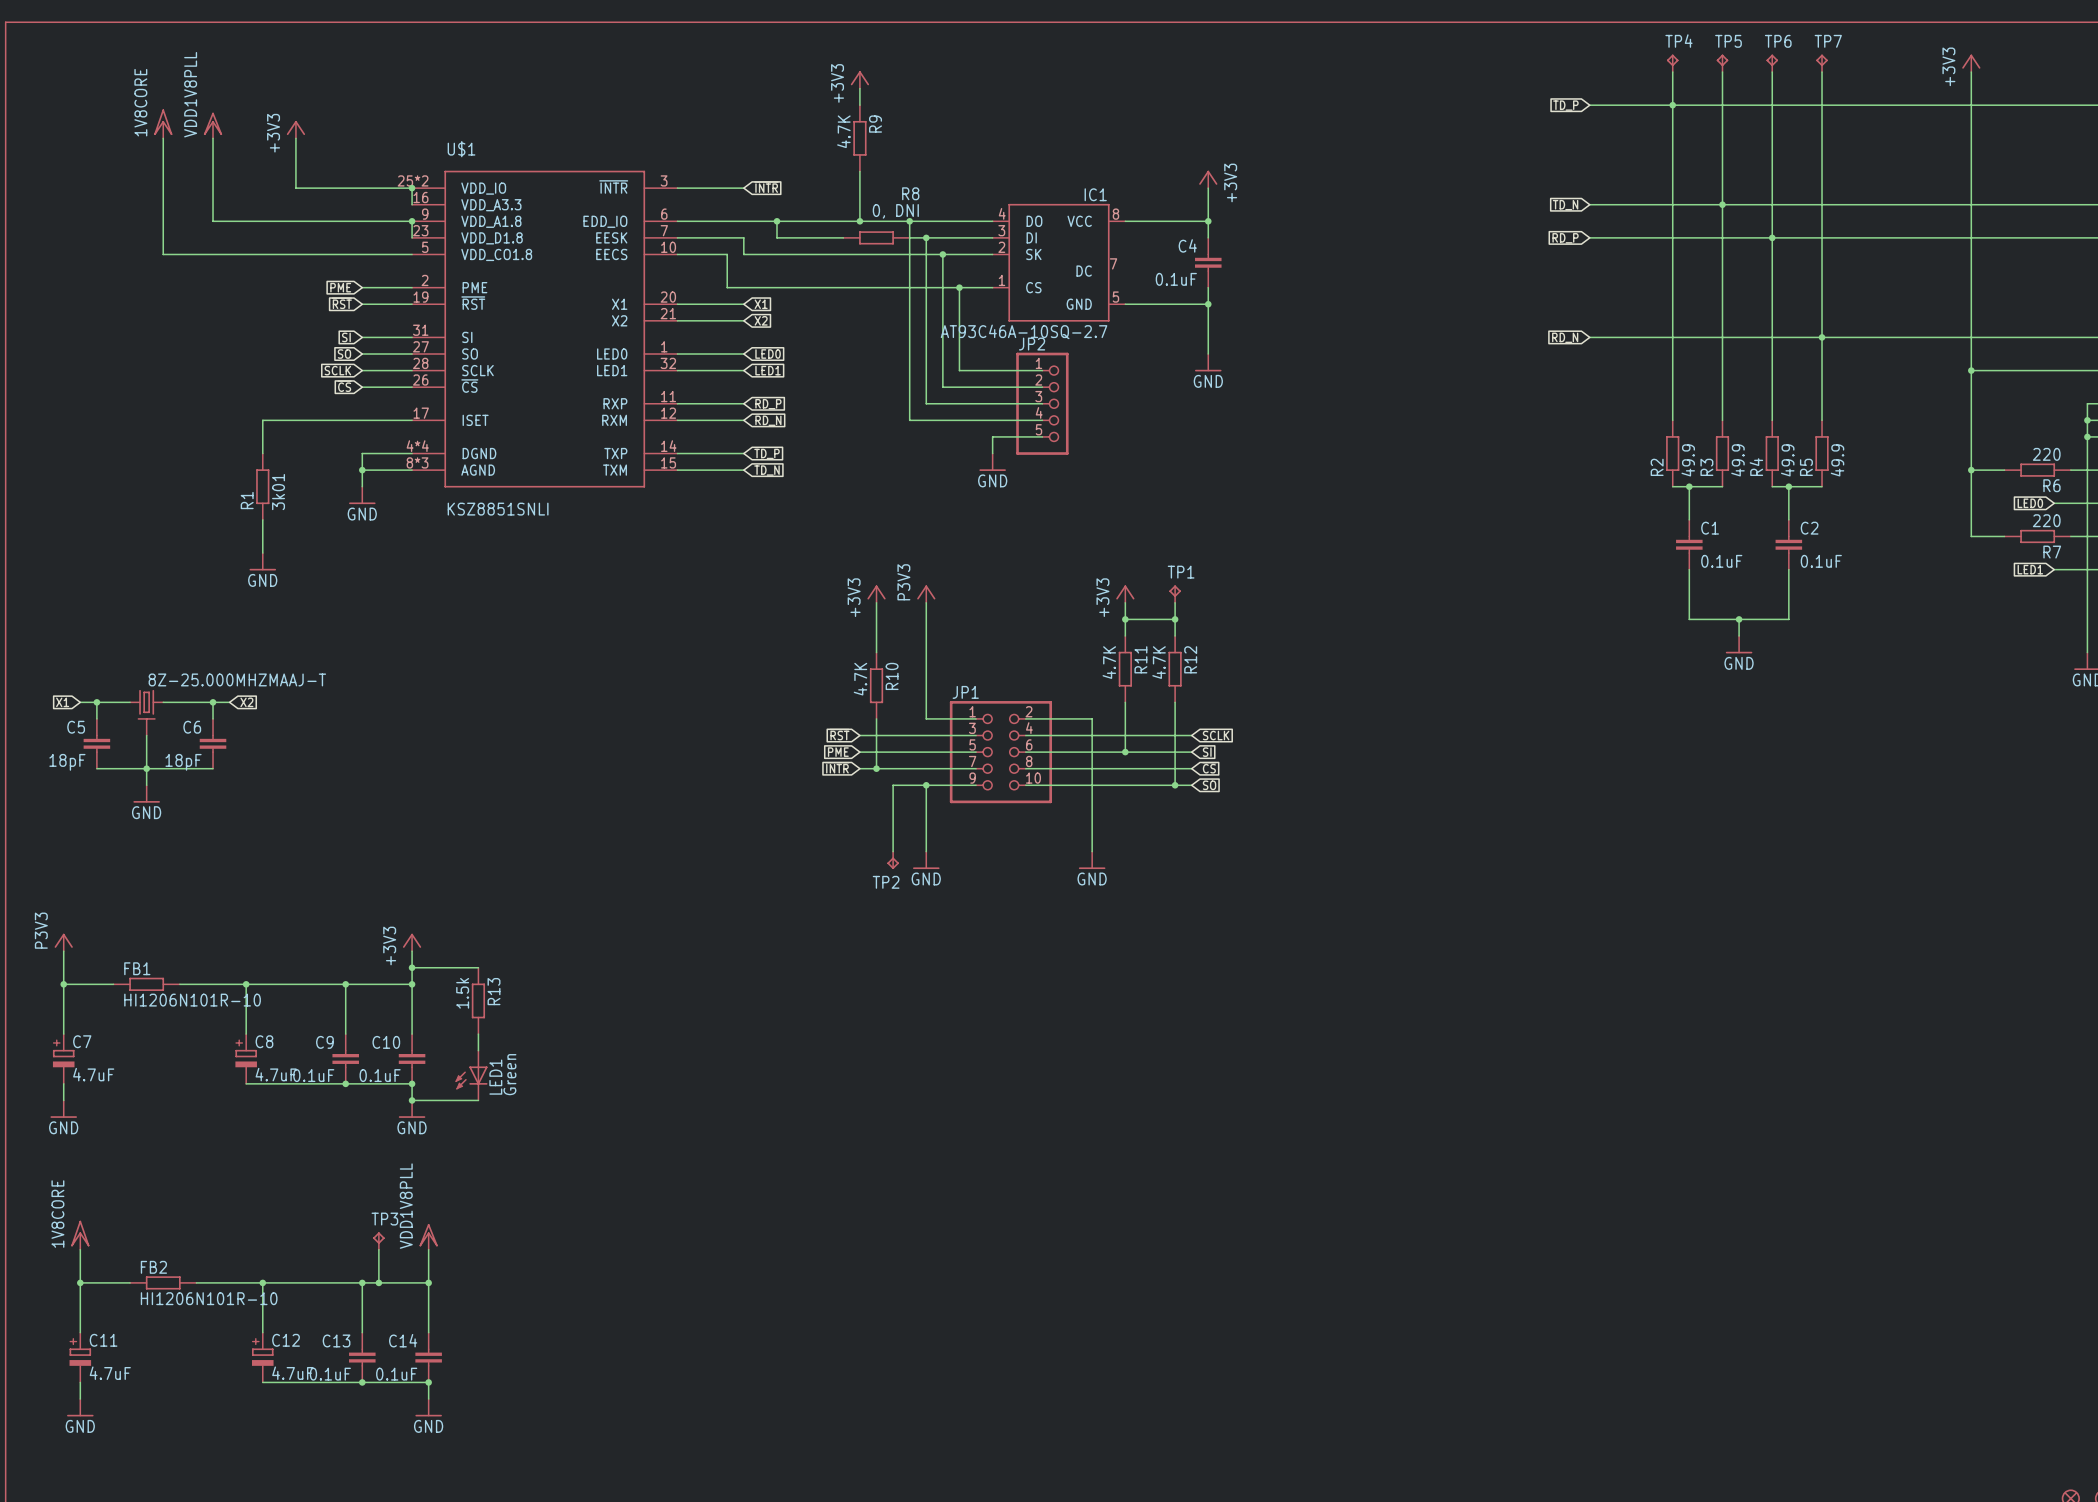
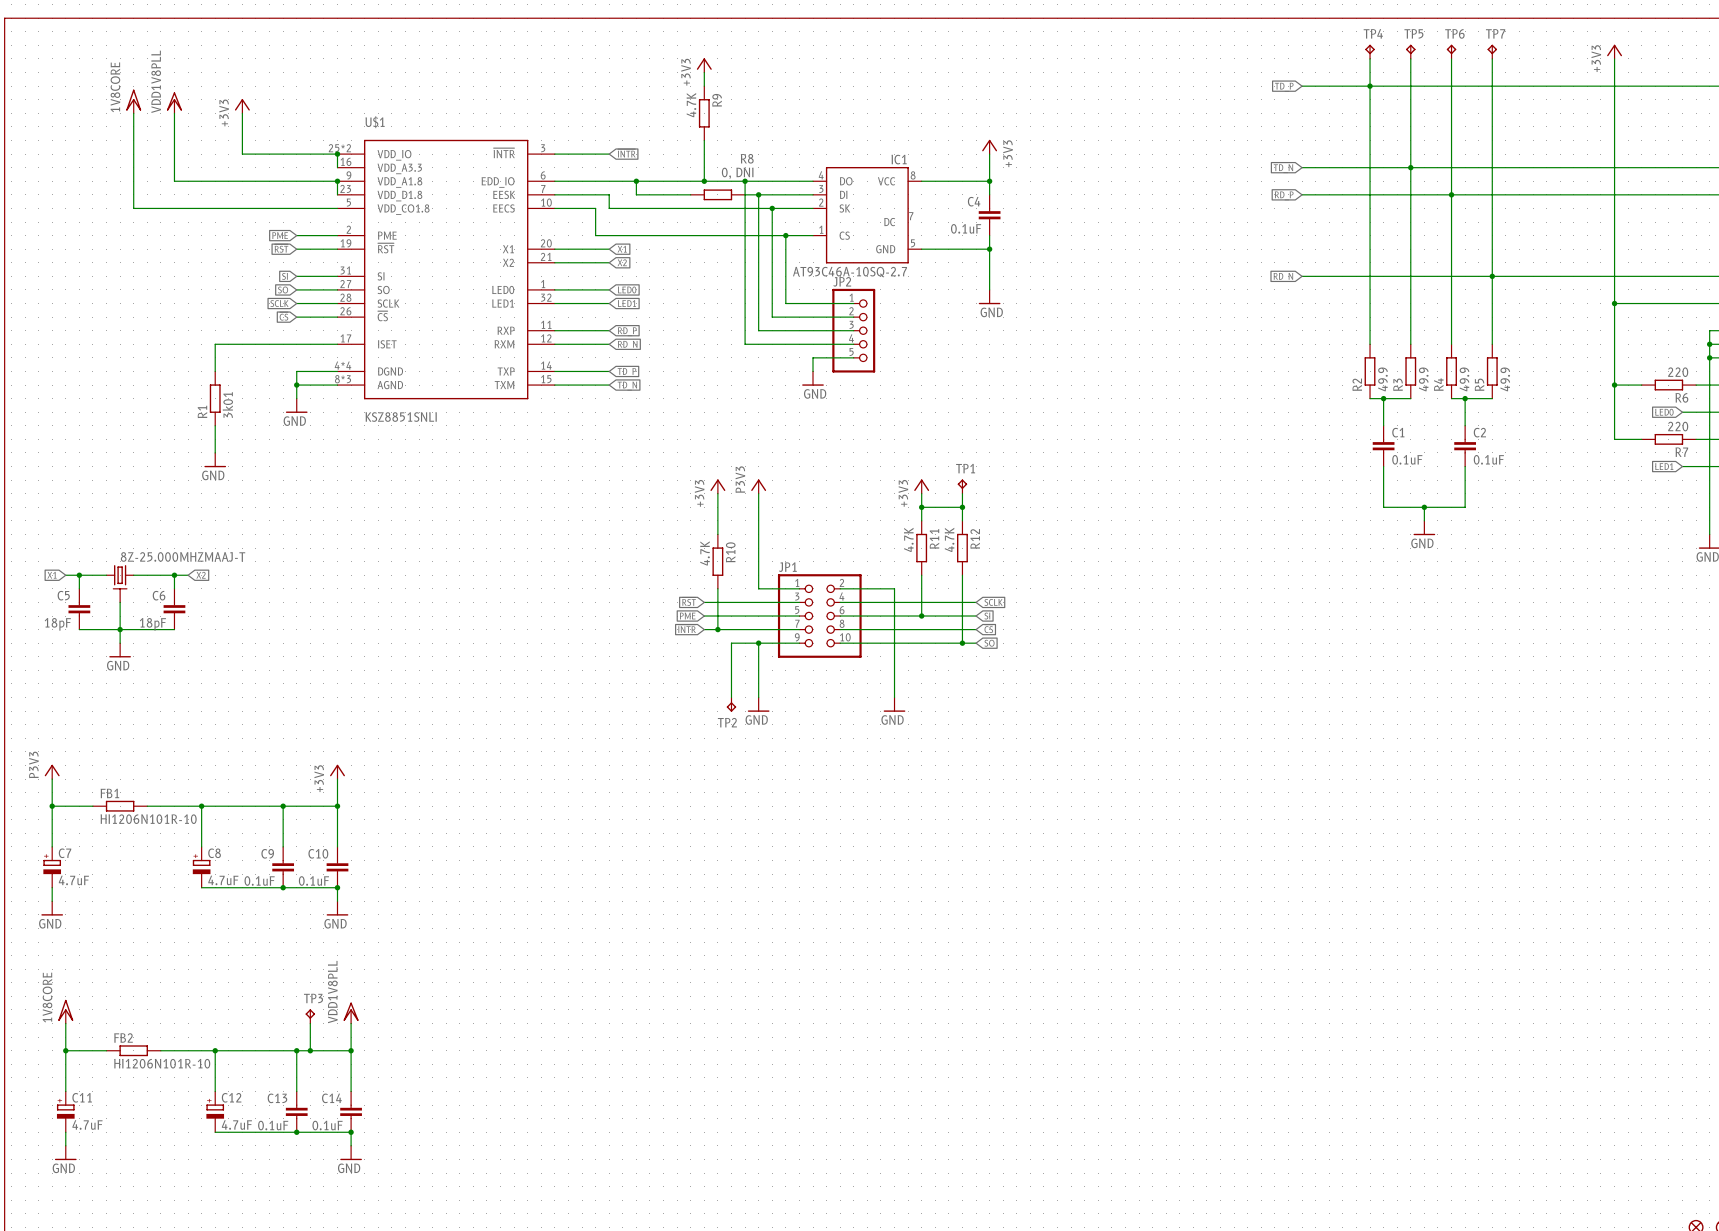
wire: (412, 967) (478, 967) -> none
junction: (412, 967) -> none
R13: 1.5k (478, 1000) -> none
wire: (478, 1034) (478, 1050) -> none
LED1: Green (471, 1075) -> none
wire: (412, 1100) (478, 1100) -> none
junction: (412, 1100) -> none

